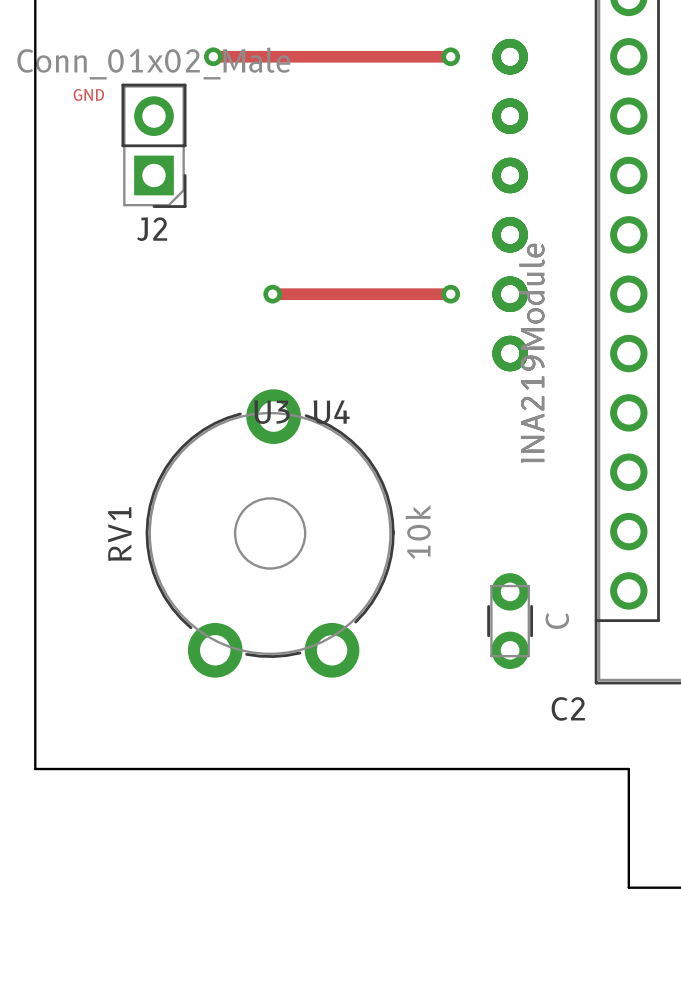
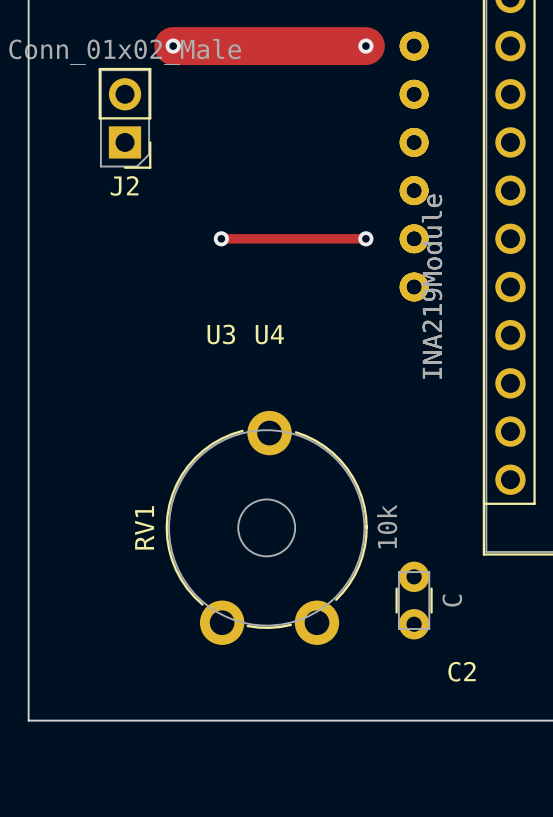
track width: thin (213, 56) (450, 56) -> thick (173, 46) (365, 46)
text: GND (88, 94) -> none
RV1 position: (270, 533) -> (266, 527)
C2 position: (510, 621) -> (414, 600)
board edge: (35, 769) (628, 769) (628, 887) -> (28, 624) (28, 720) (510, 720)

